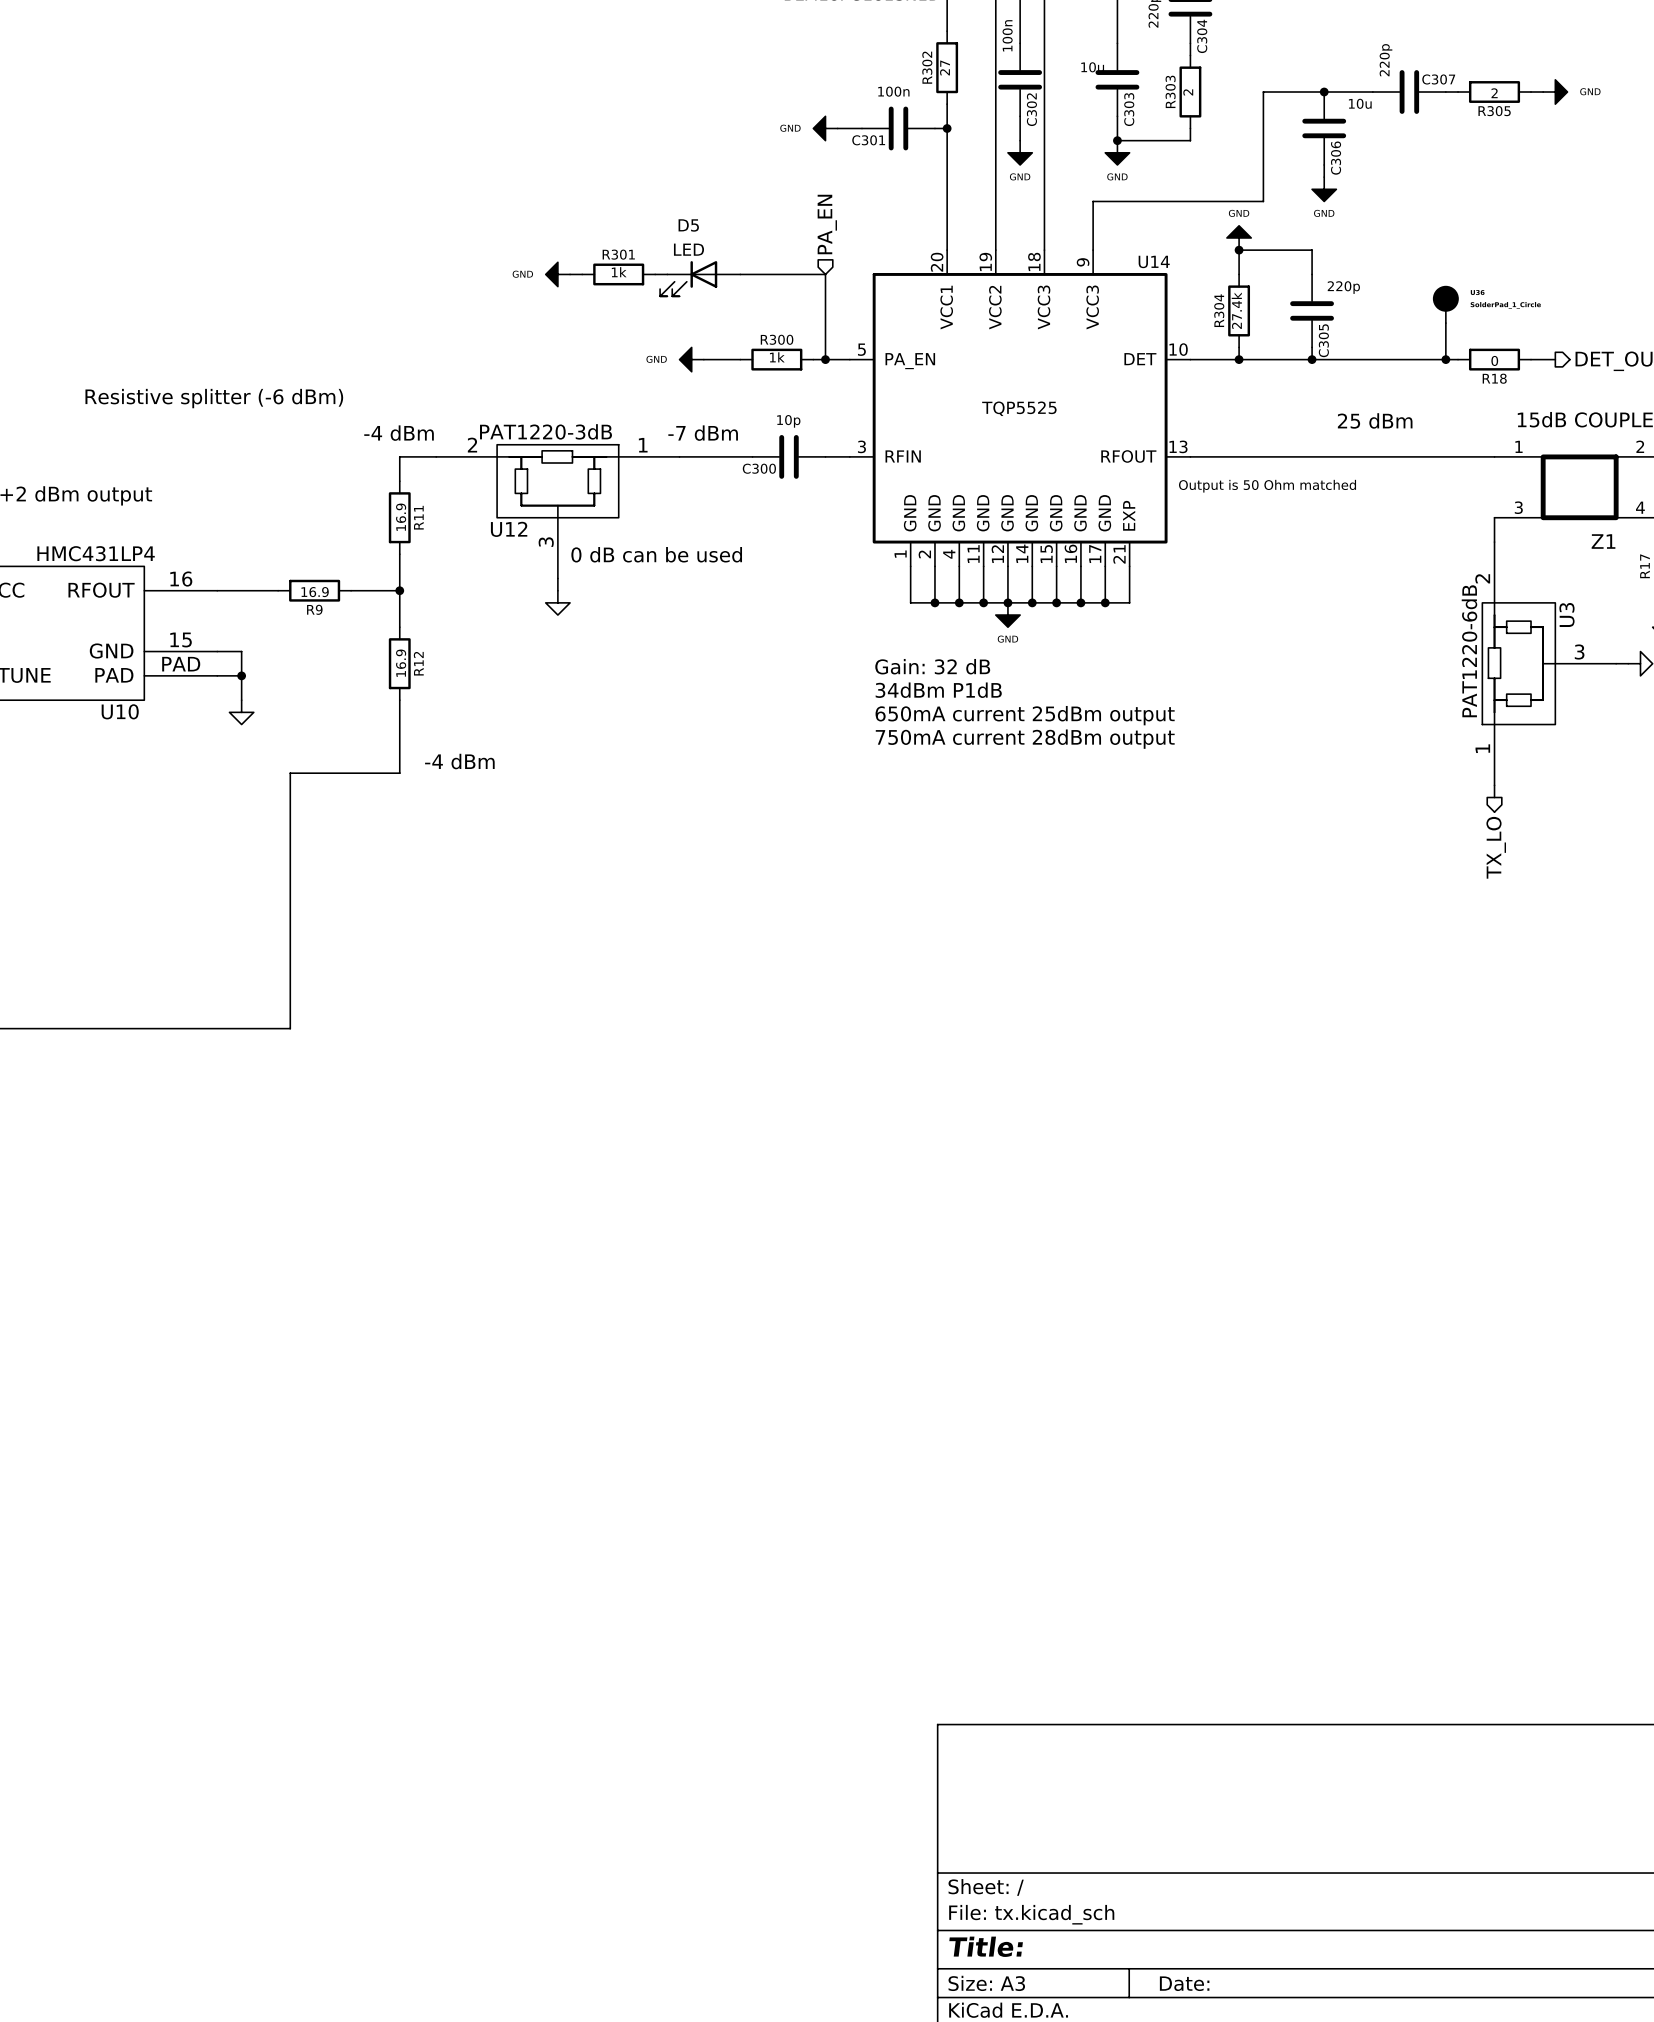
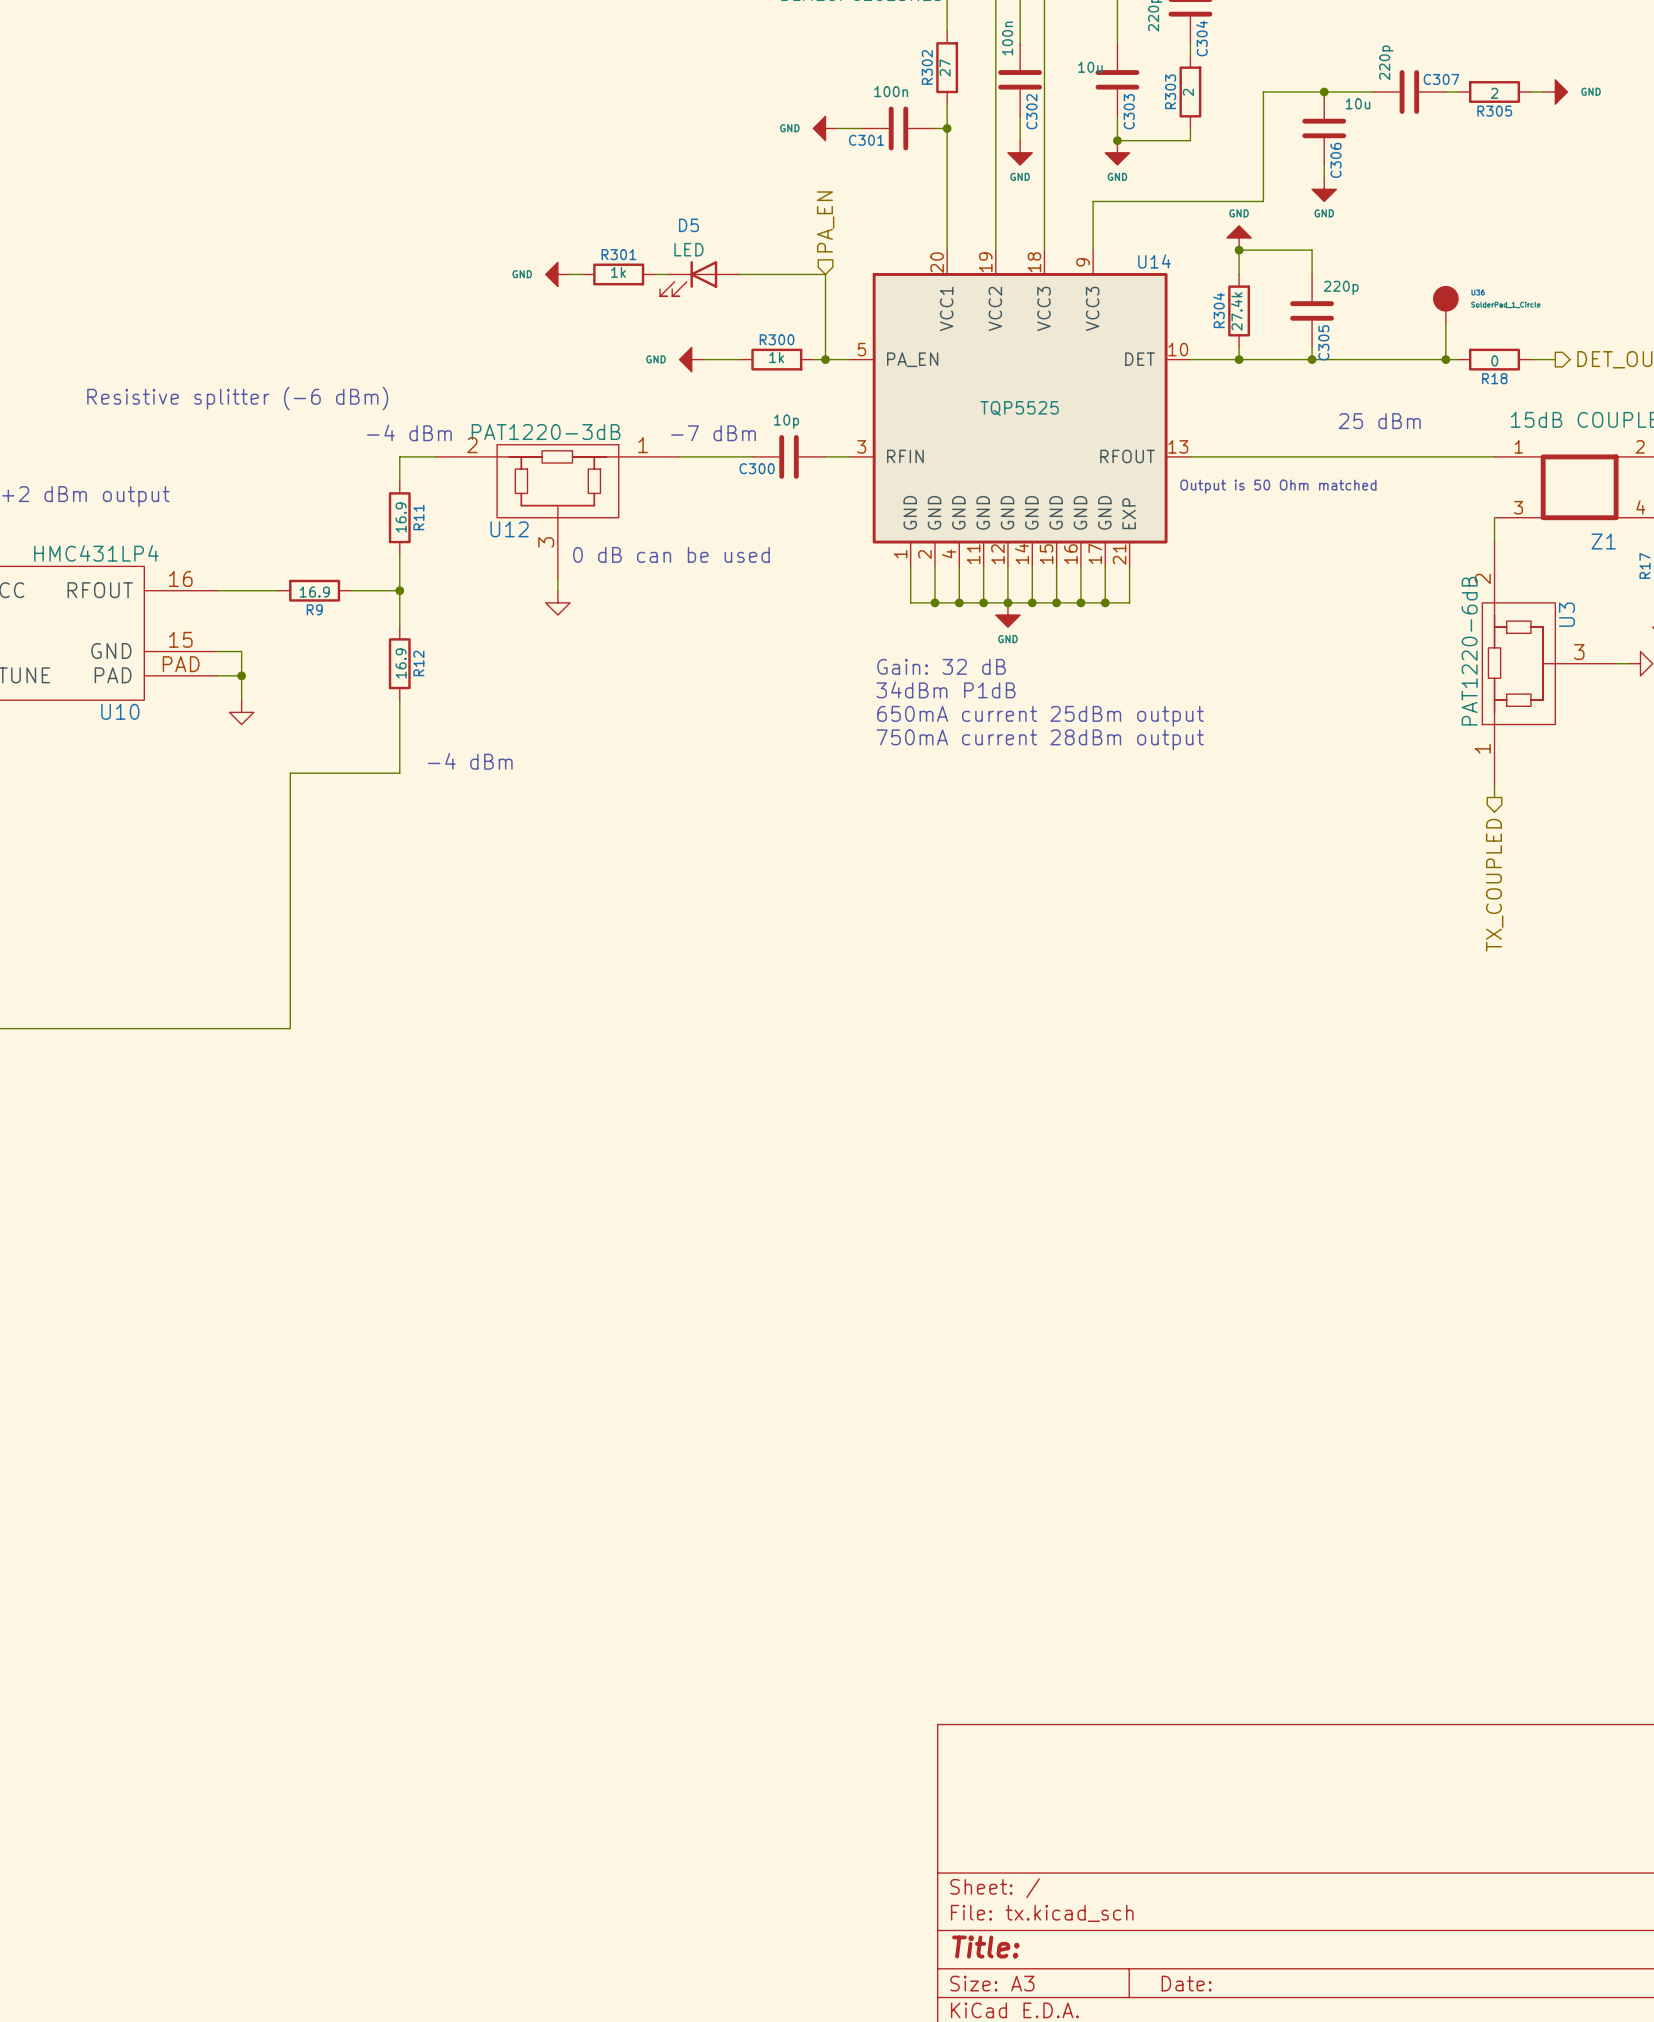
hierarchical label: TX_LO (1496, 847) -> TX_COUPLED (1494, 885)

